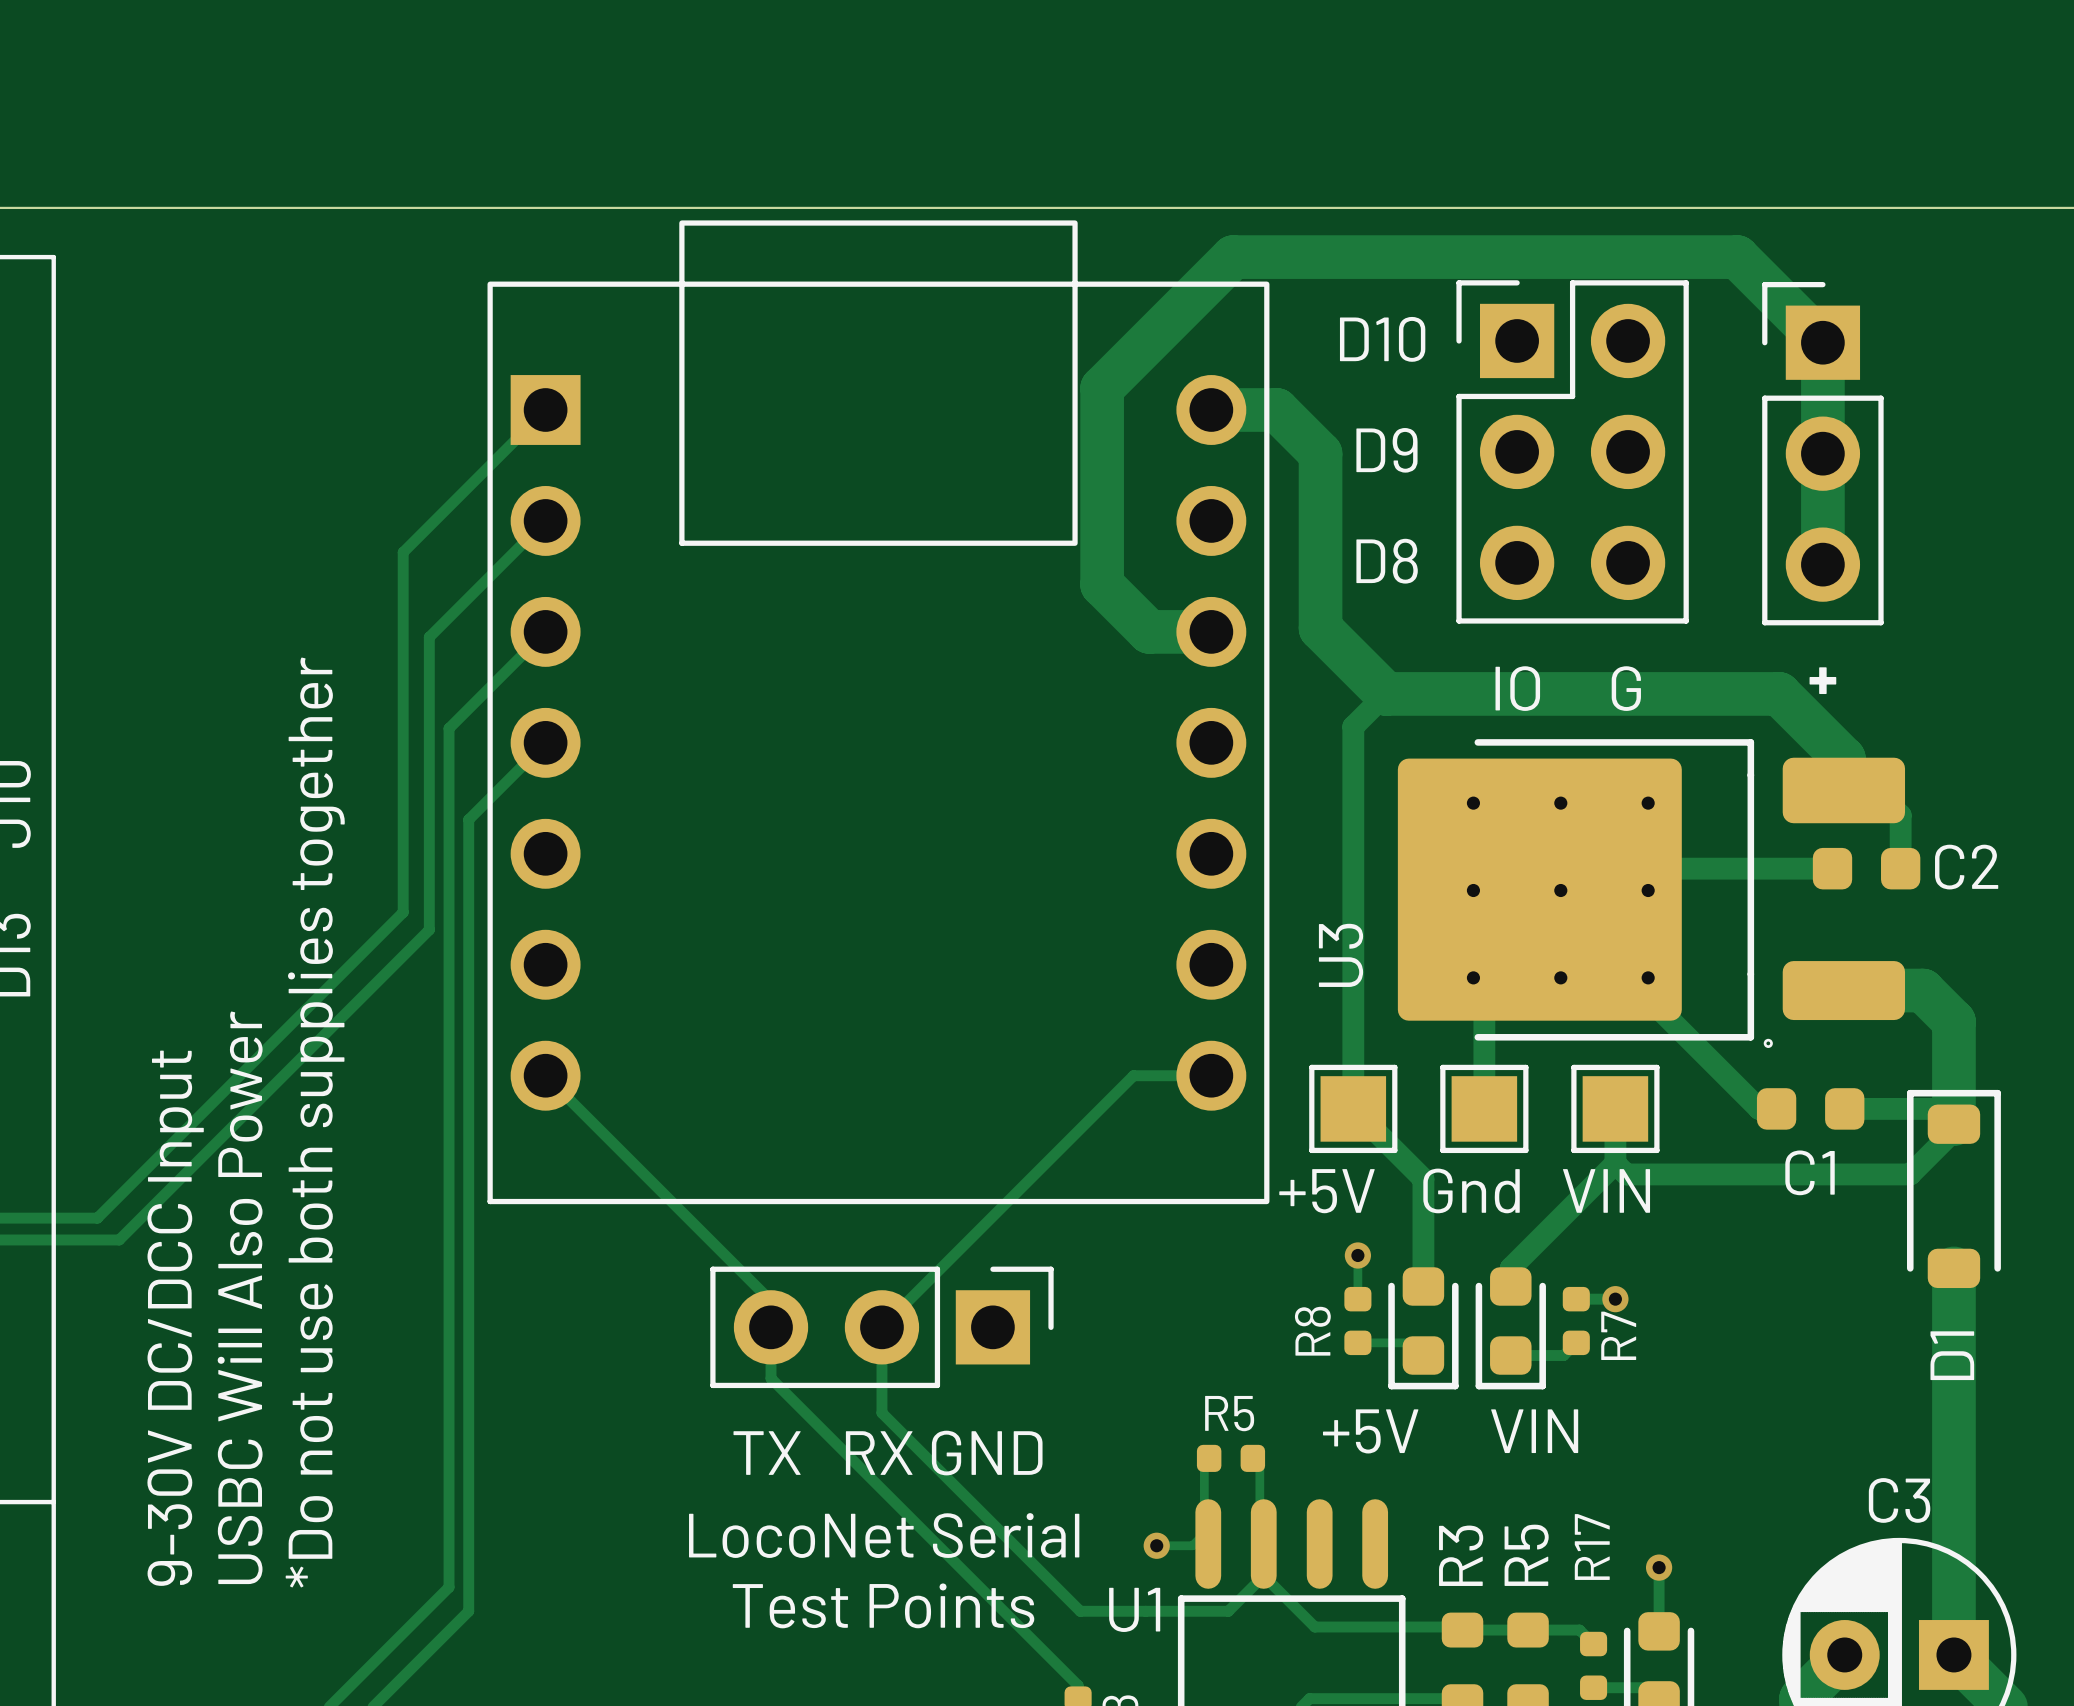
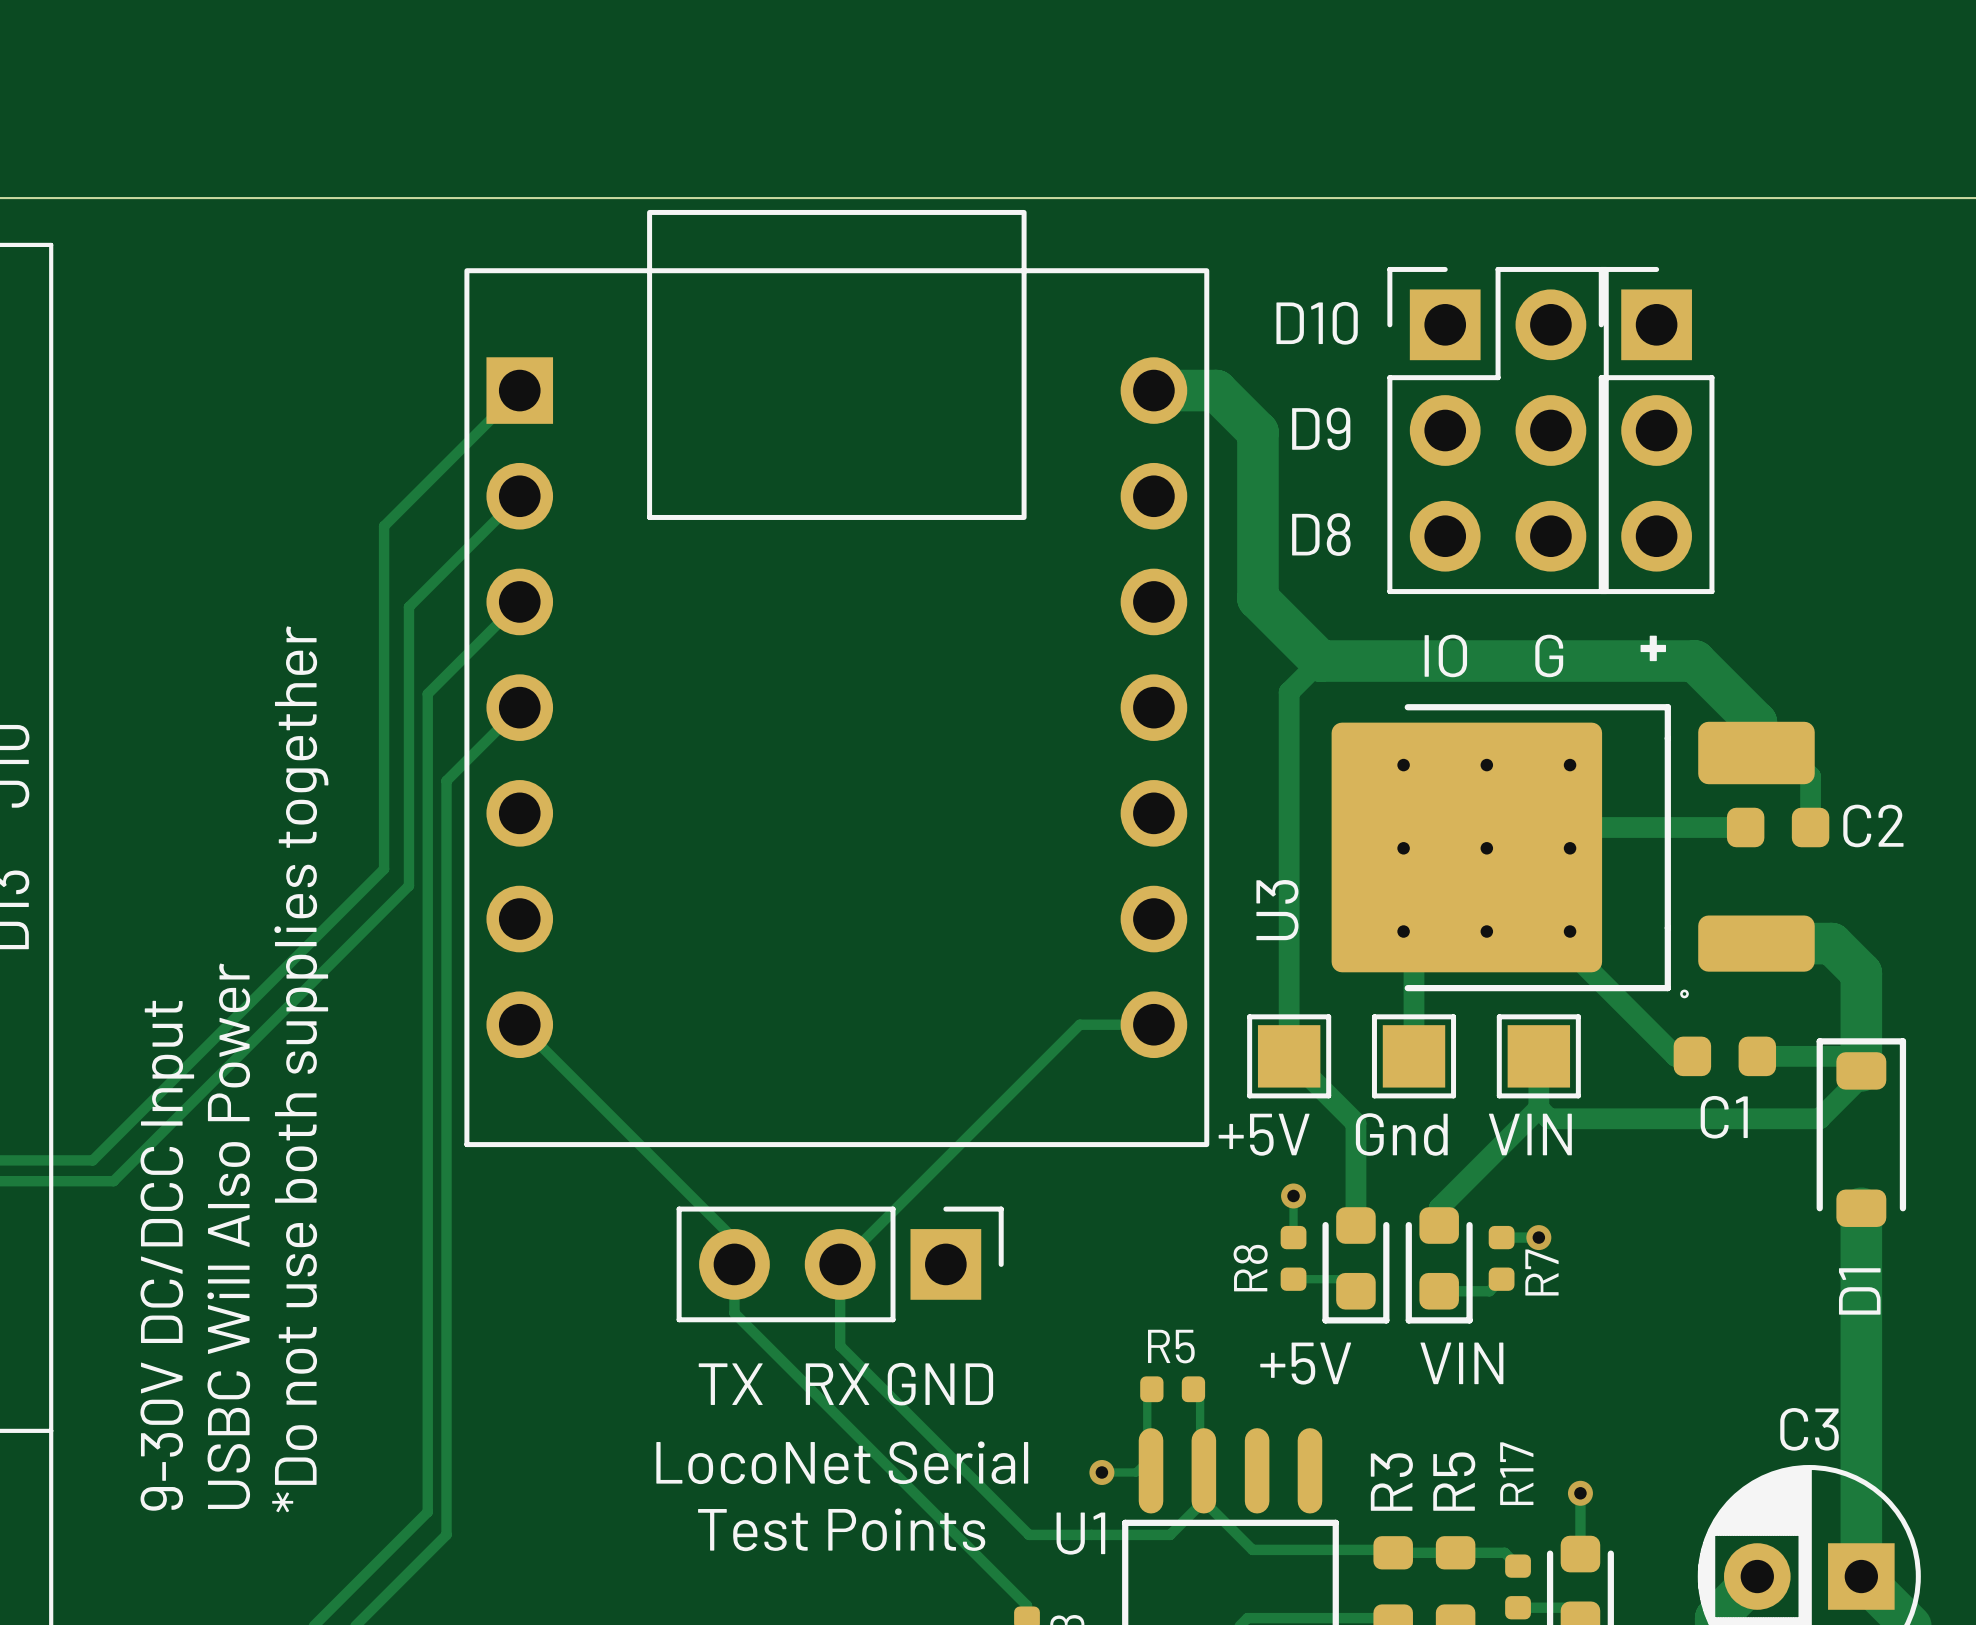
part position: (1822, 453) -> (1656, 430)
track: (1822, 564) (1822, 342) (1737, 257) (1233, 257) (1102, 388) (1102, 584) (1149, 631) (1211, 631) -> none
text position: + (1822, 680) -> + (1653, 648)

